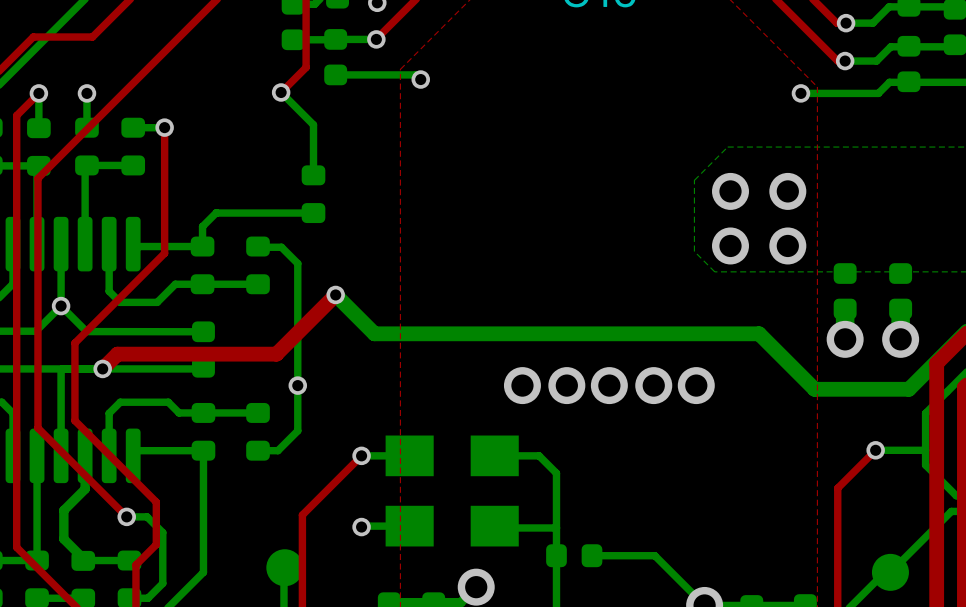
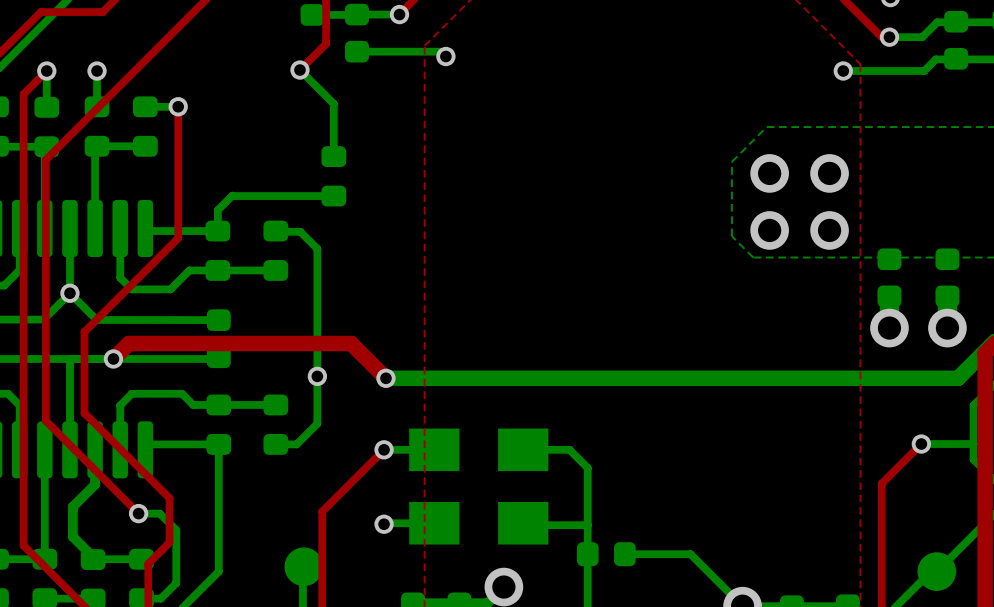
top track: (335, 294) (276, 354) -> (385, 378) (351, 343) (295, 343)
bottom track: (335, 294) (374, 333) (759, 333) (814, 389) (908, 389) (910, 387) -> (385, 378) (958, 378)
via position: (335, 294) -> (385, 378)
via: (522, 385) -> none
via: (566, 385) -> none
via: (609, 385) -> none
via: (653, 385) -> none
via: (696, 385) -> none

